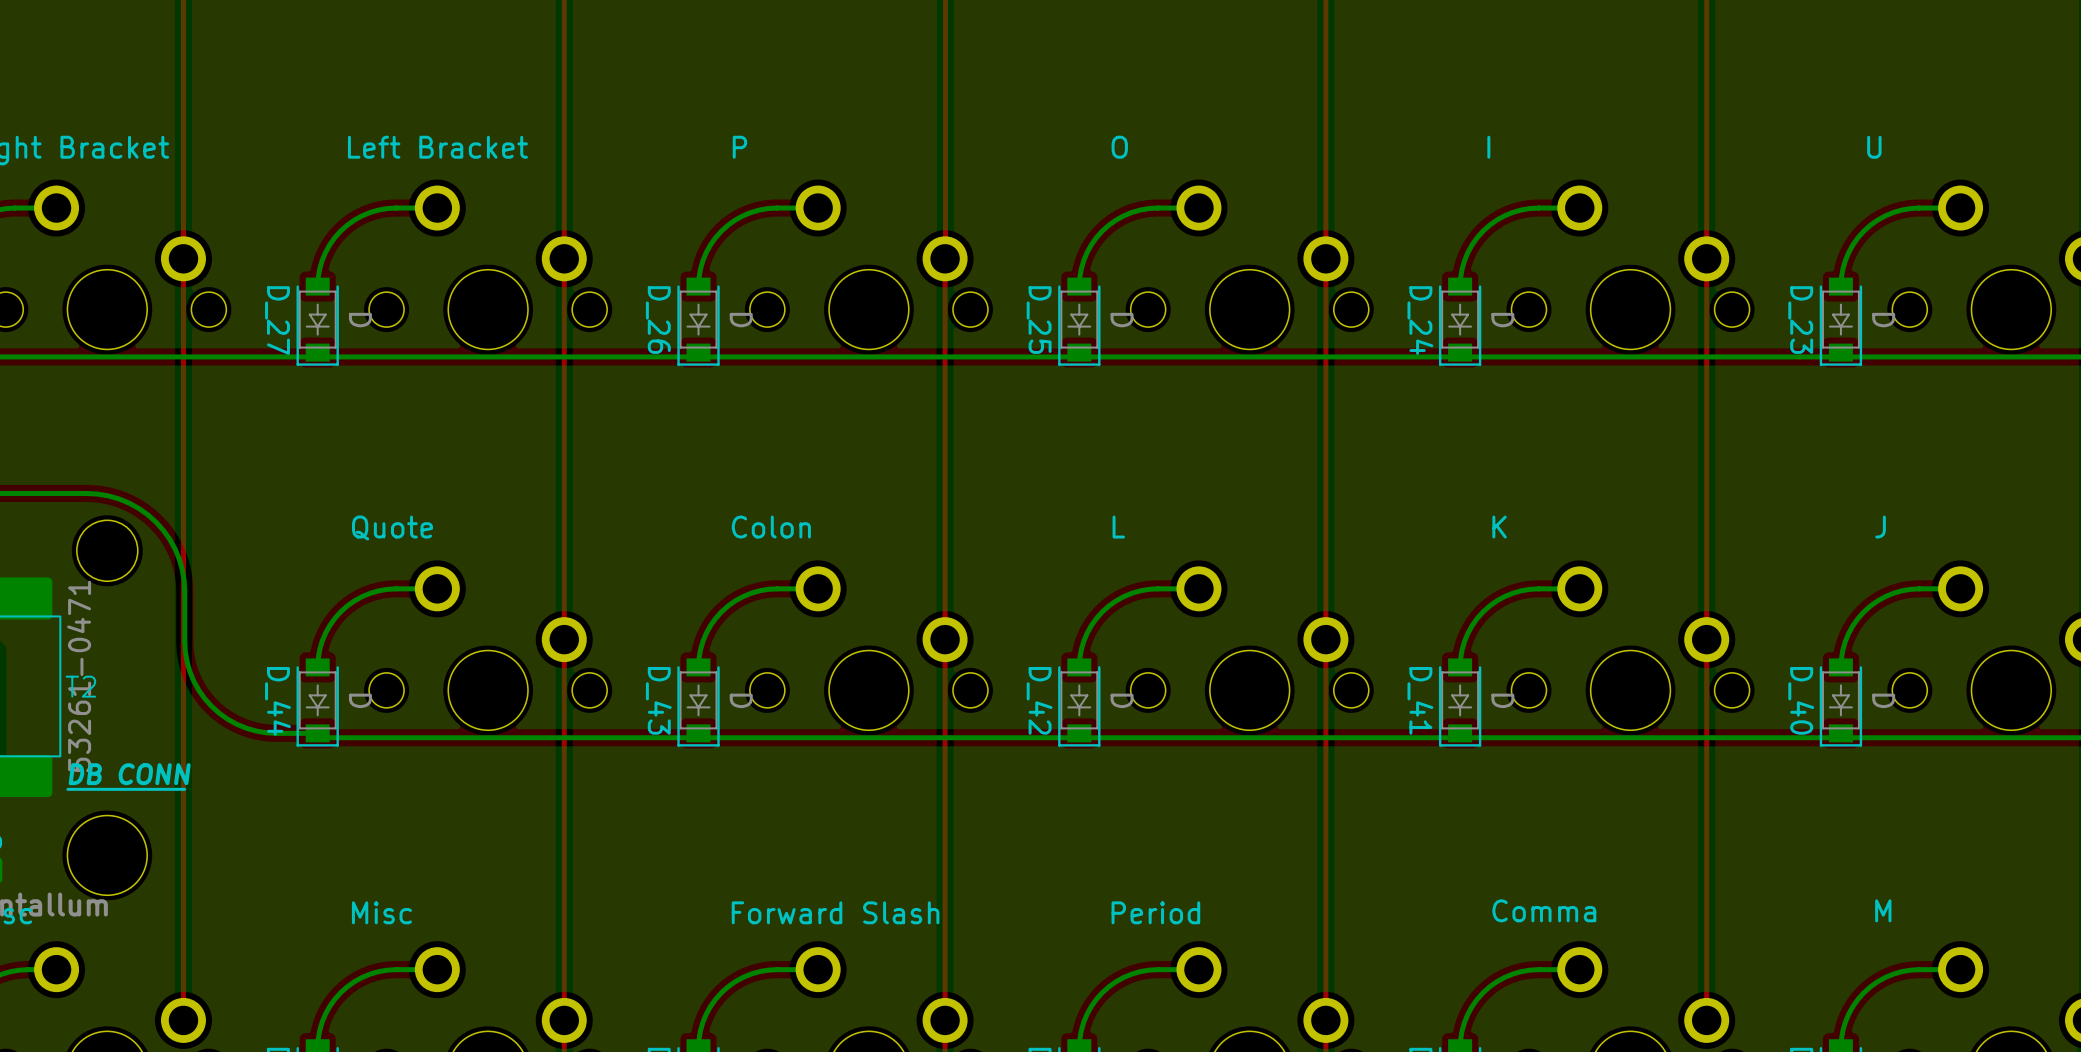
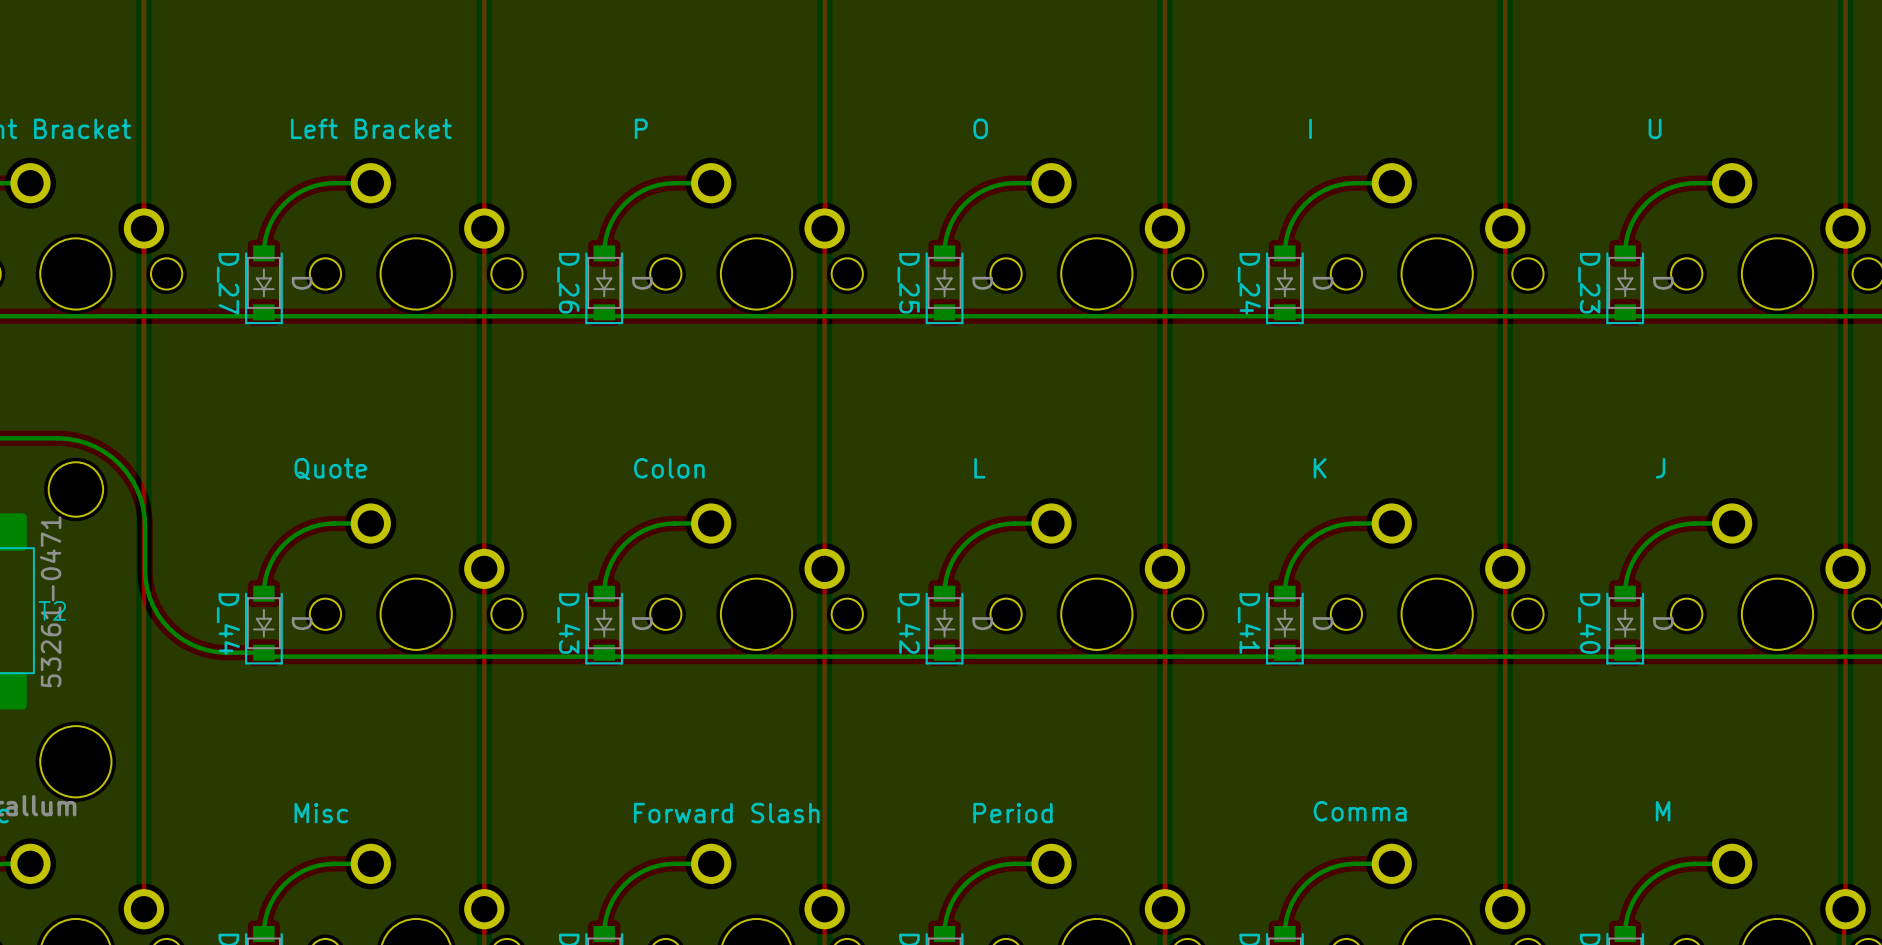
text: DB CONN (129, 774) -> none
line: (184, 789) (67, 789) -> none

